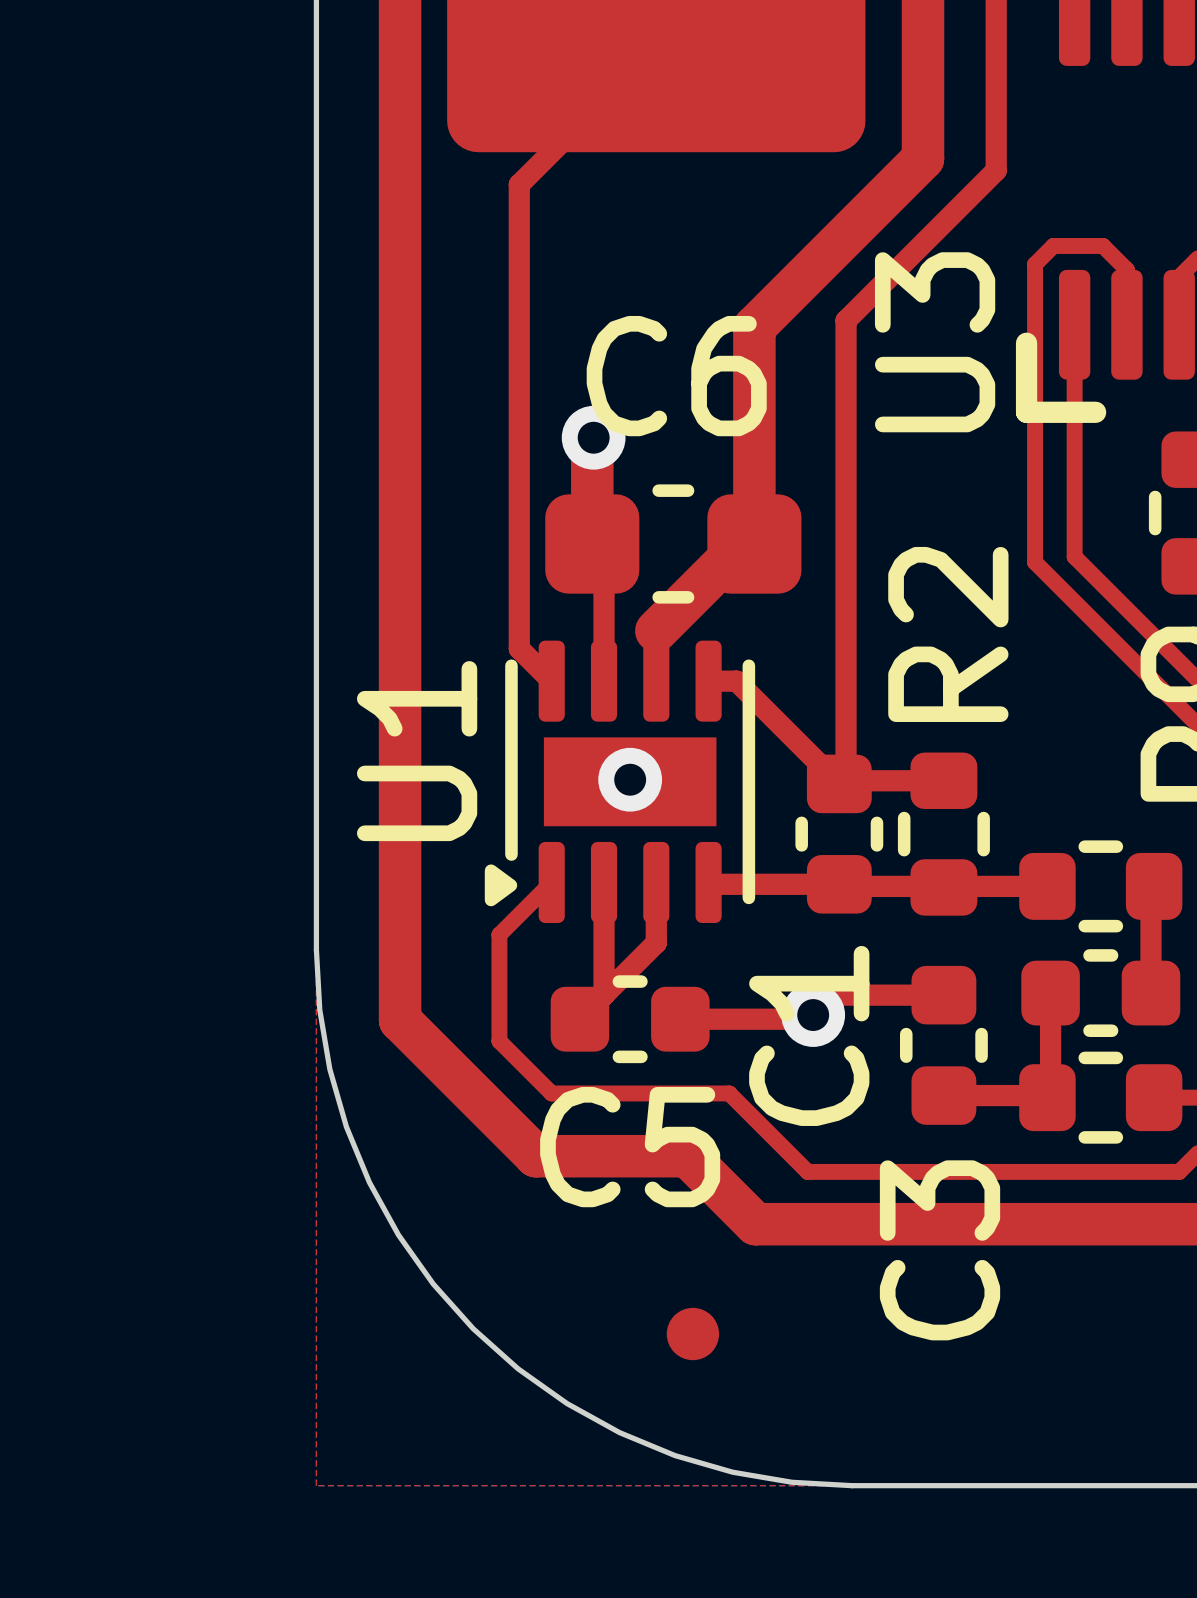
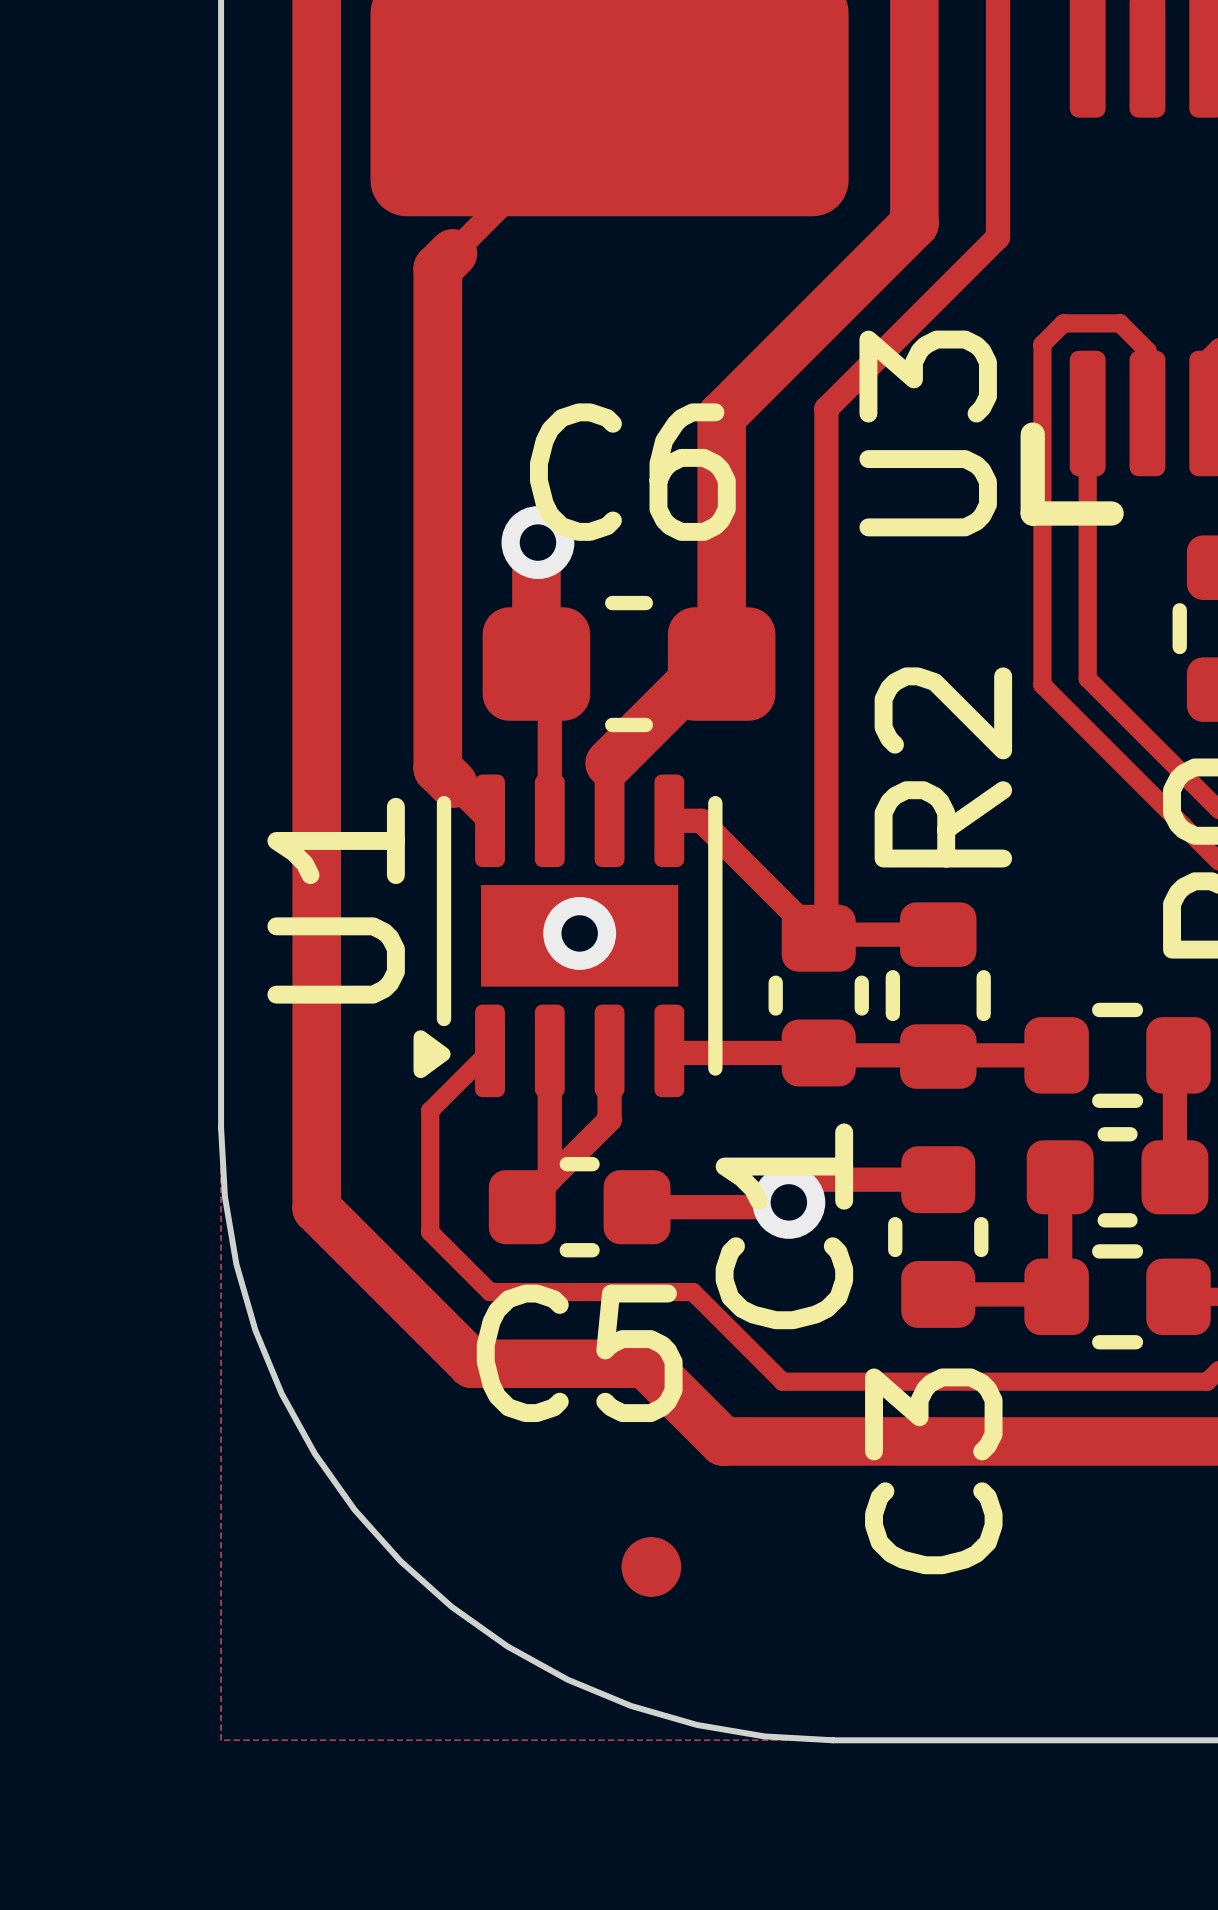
top track: (519, 184) (519, 648) -> (452, 253) (437, 268) (437, 768) (452, 783)

